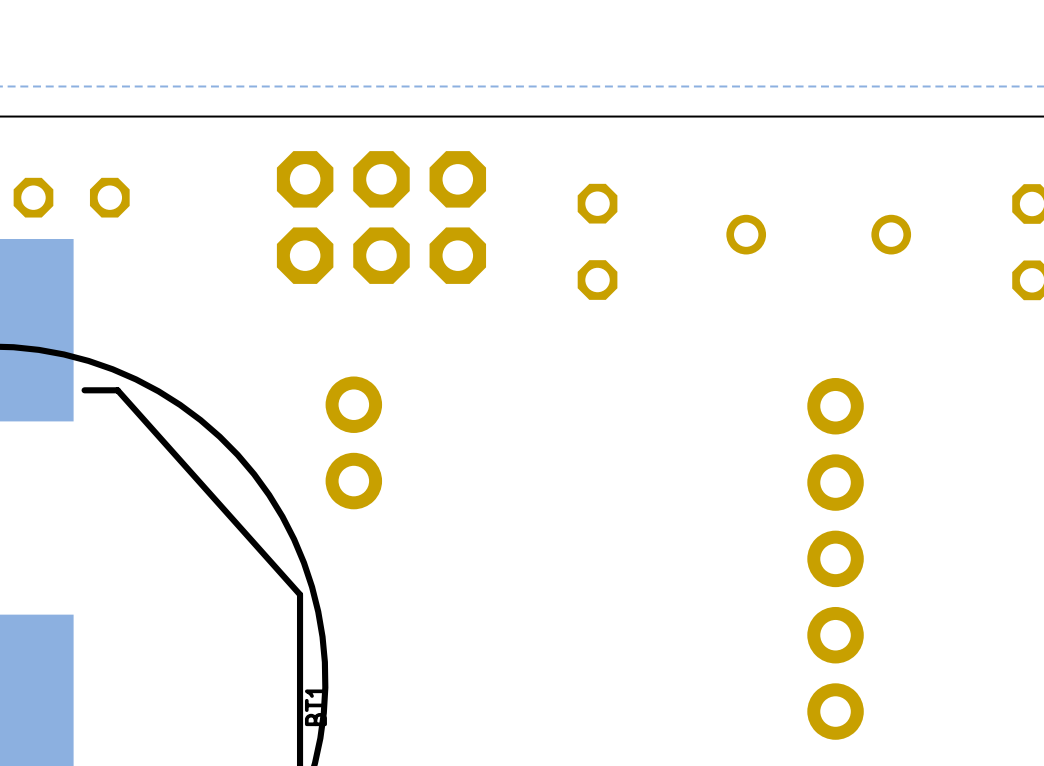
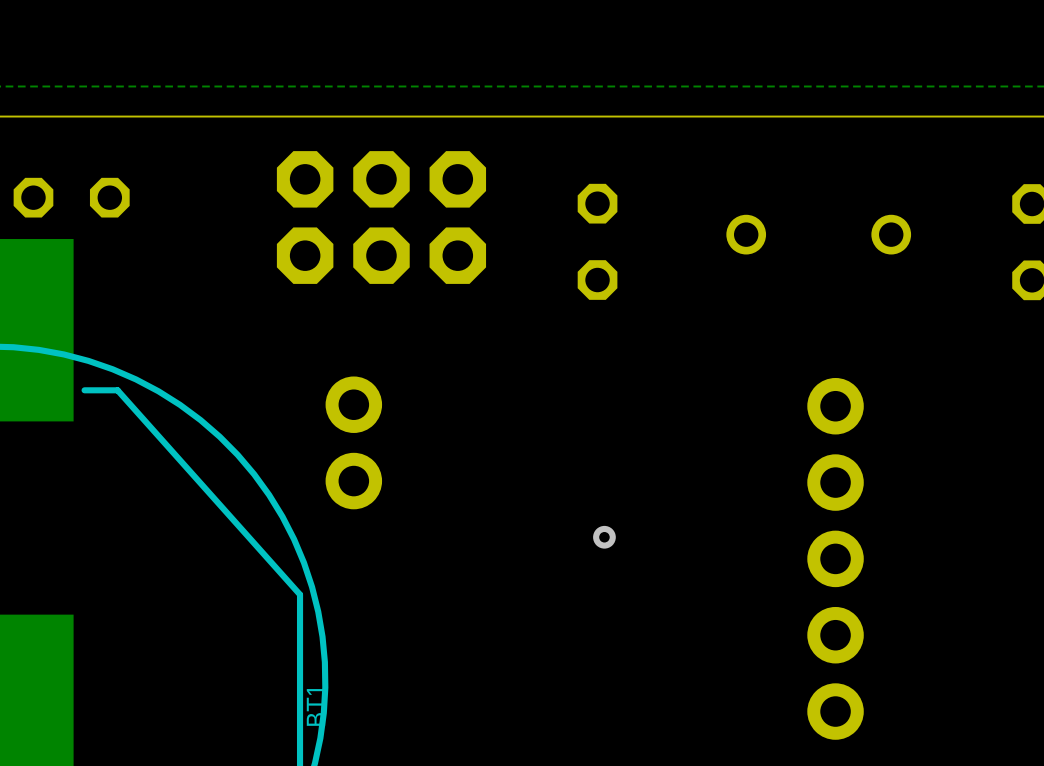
via: none -> (604, 537)

